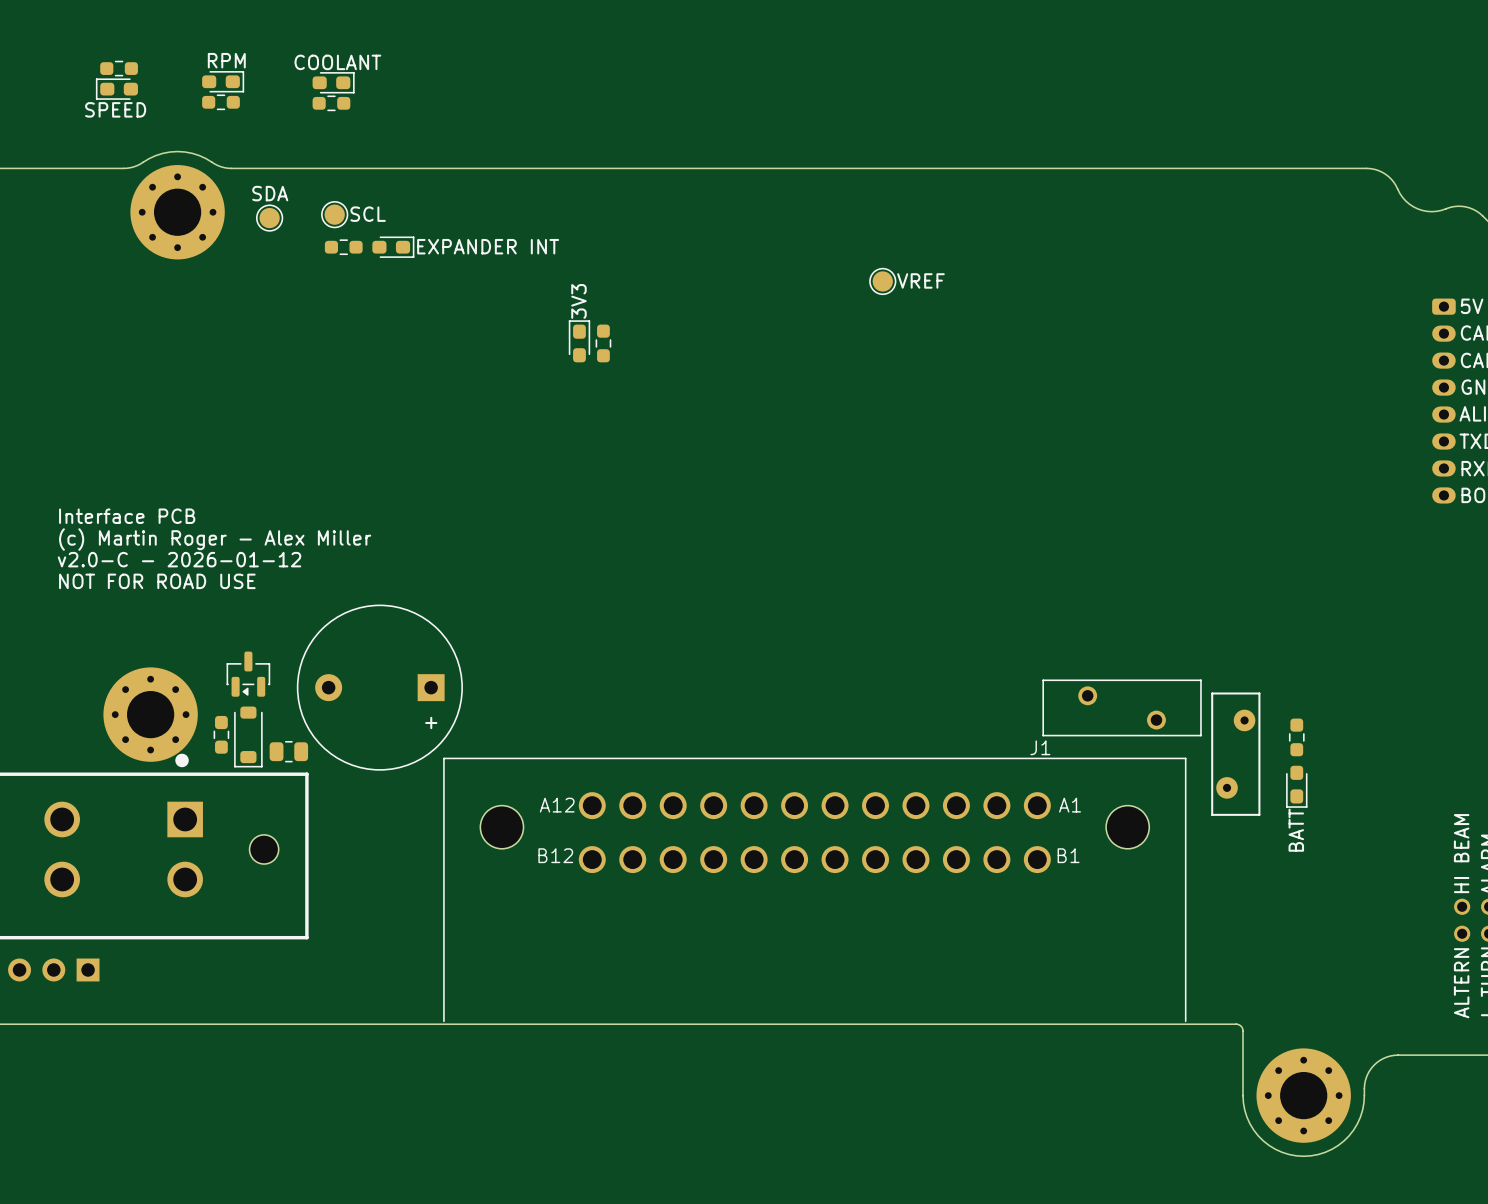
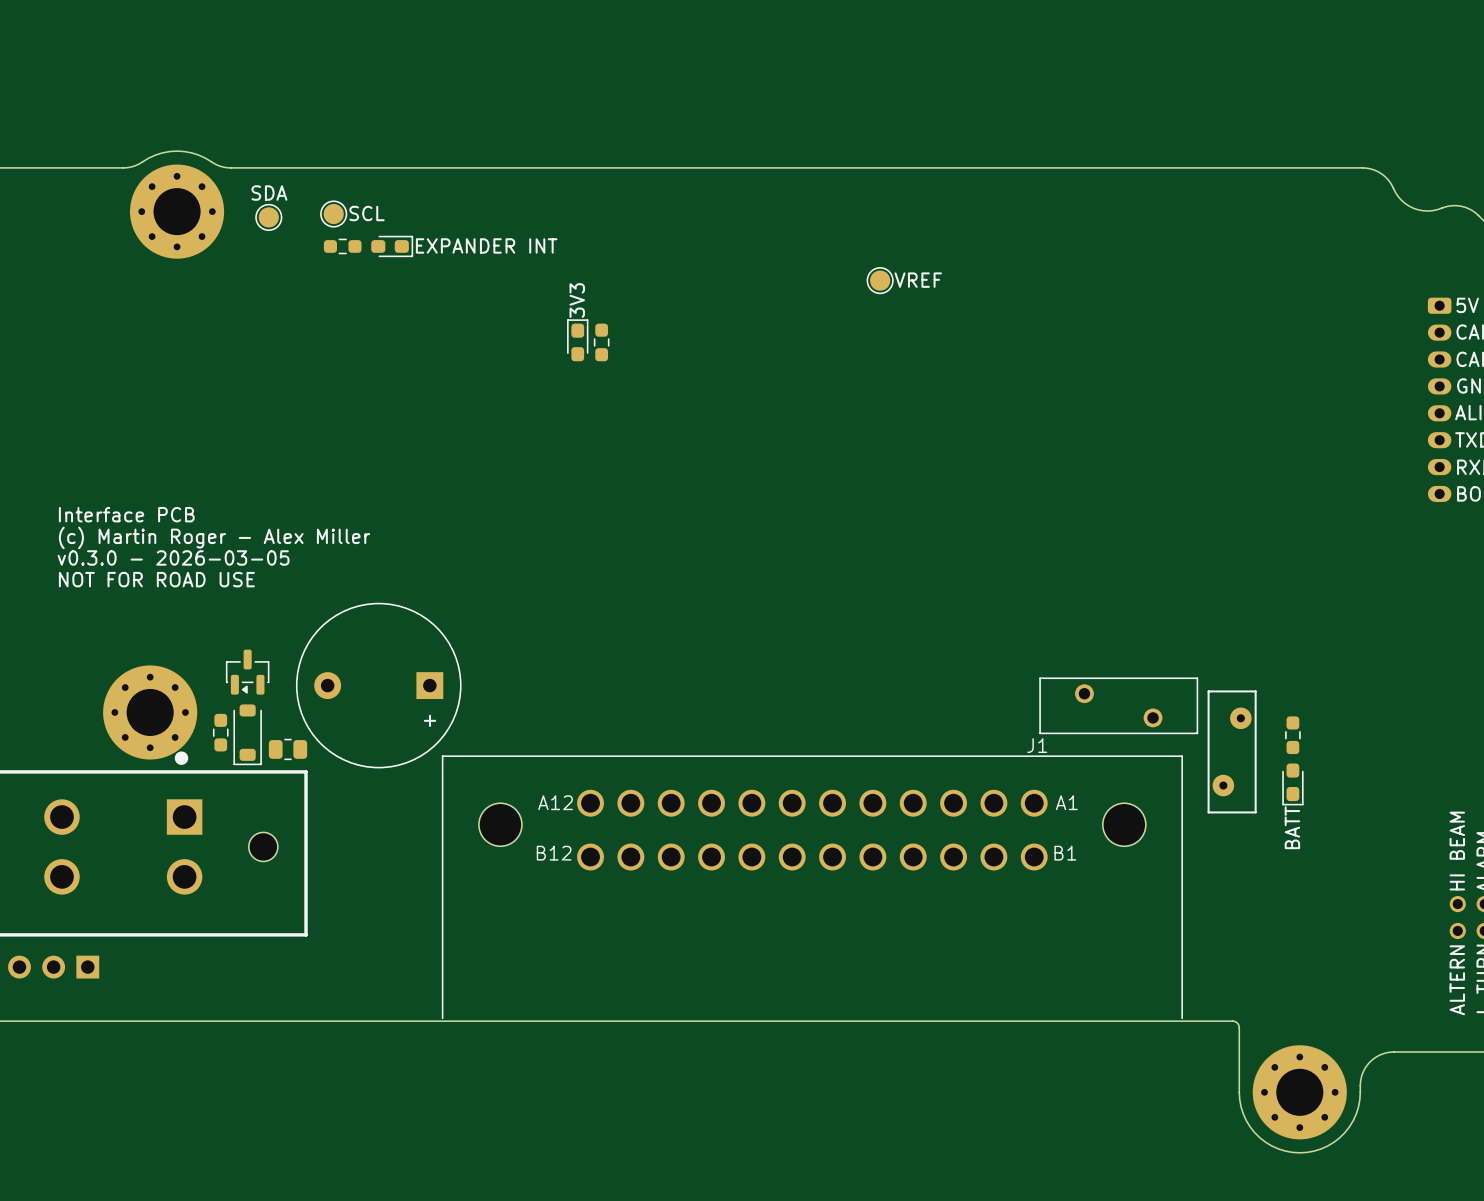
text: RPM (226, 60) -> none
text: COOLANT (337, 62) -> none
part: (119, 68) -> none
part: (223, 81) -> none
part: (333, 82) -> none
part: (116, 89) -> none
part: (220, 102) -> none
part: (331, 103) -> none
text: SPEED (115, 109) -> none
text: v2.0-C - 2026-01-12 (179, 559) -> v0.3.0 - 2026-03-05 (173, 557)

